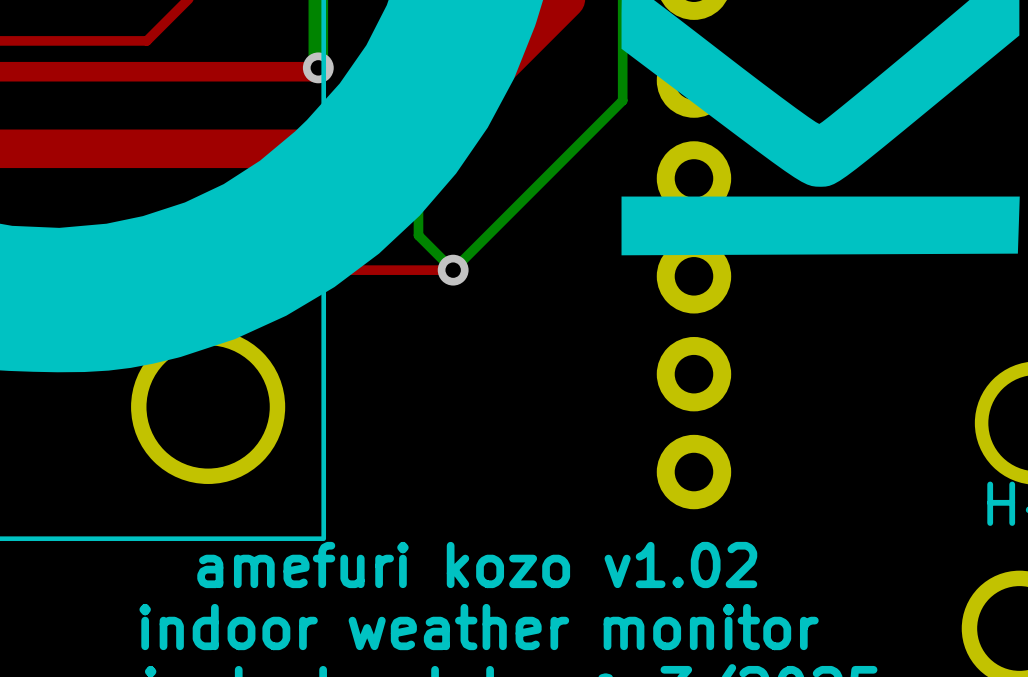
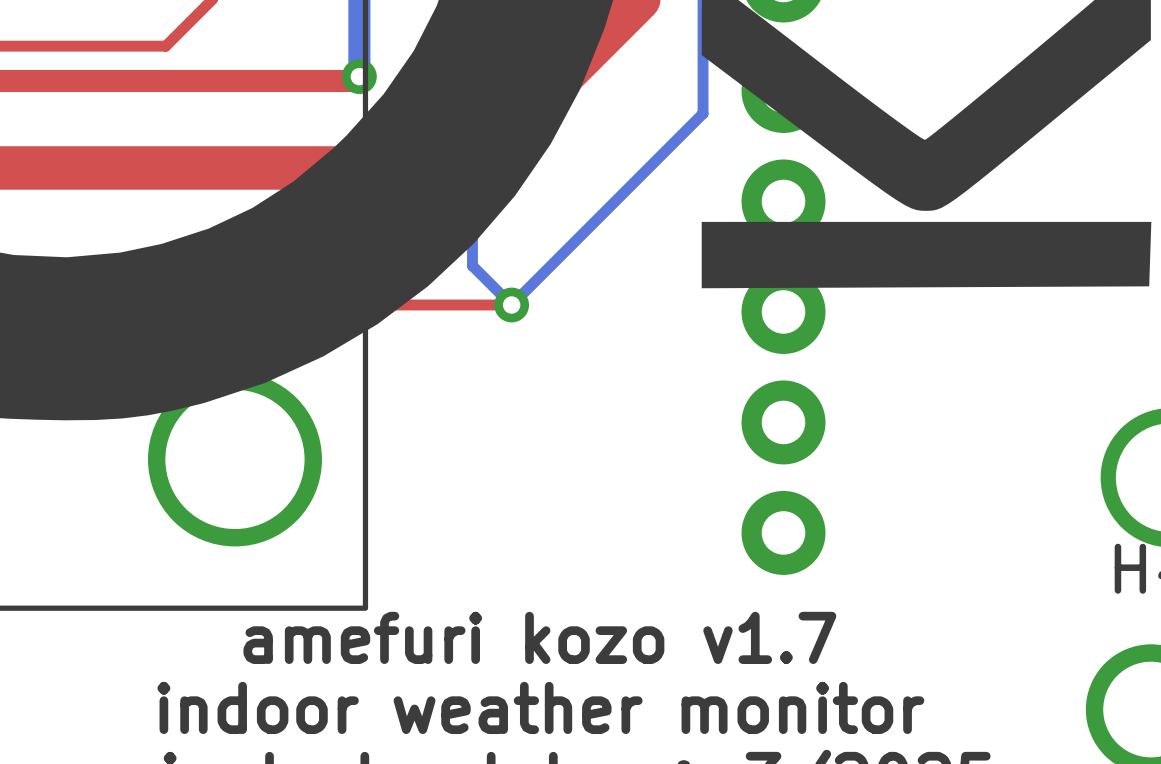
text: amefuri kozo v1.02 (477, 565) -> amefuri kozo v1.7 (539, 637)

